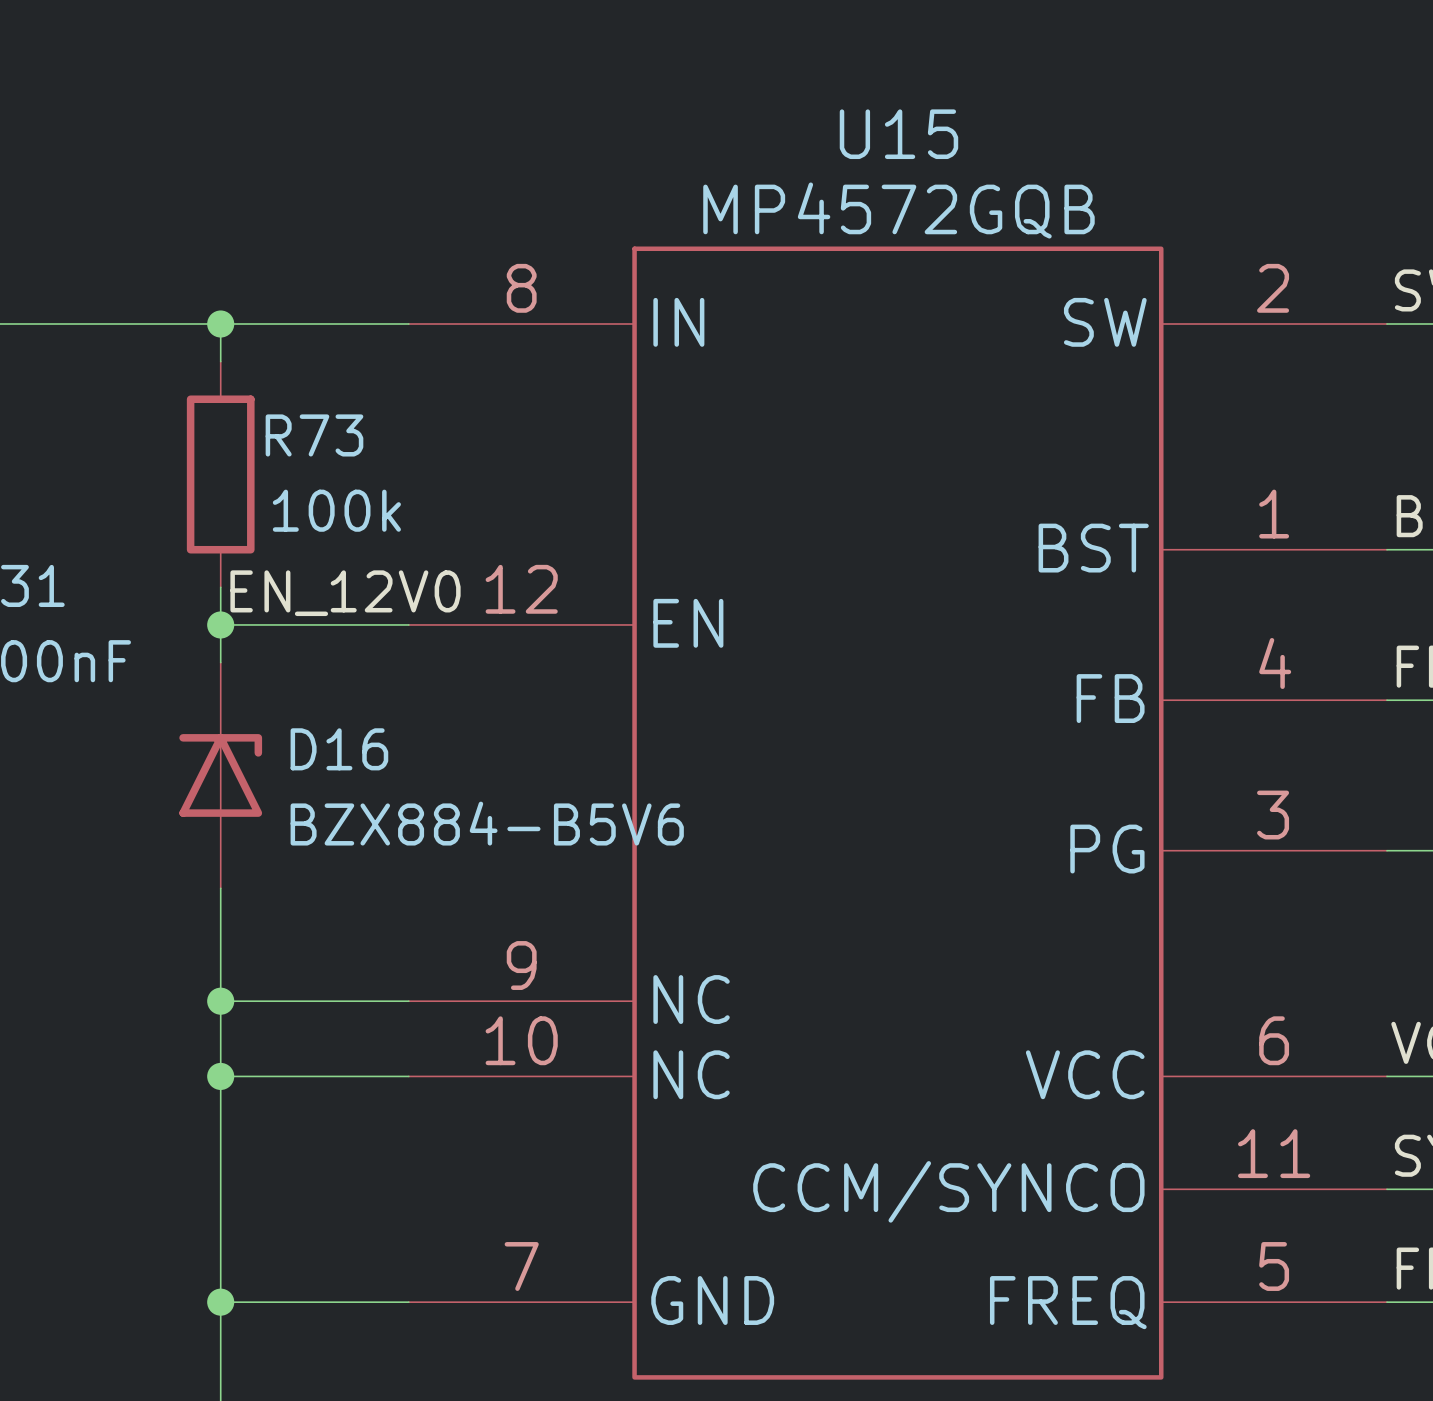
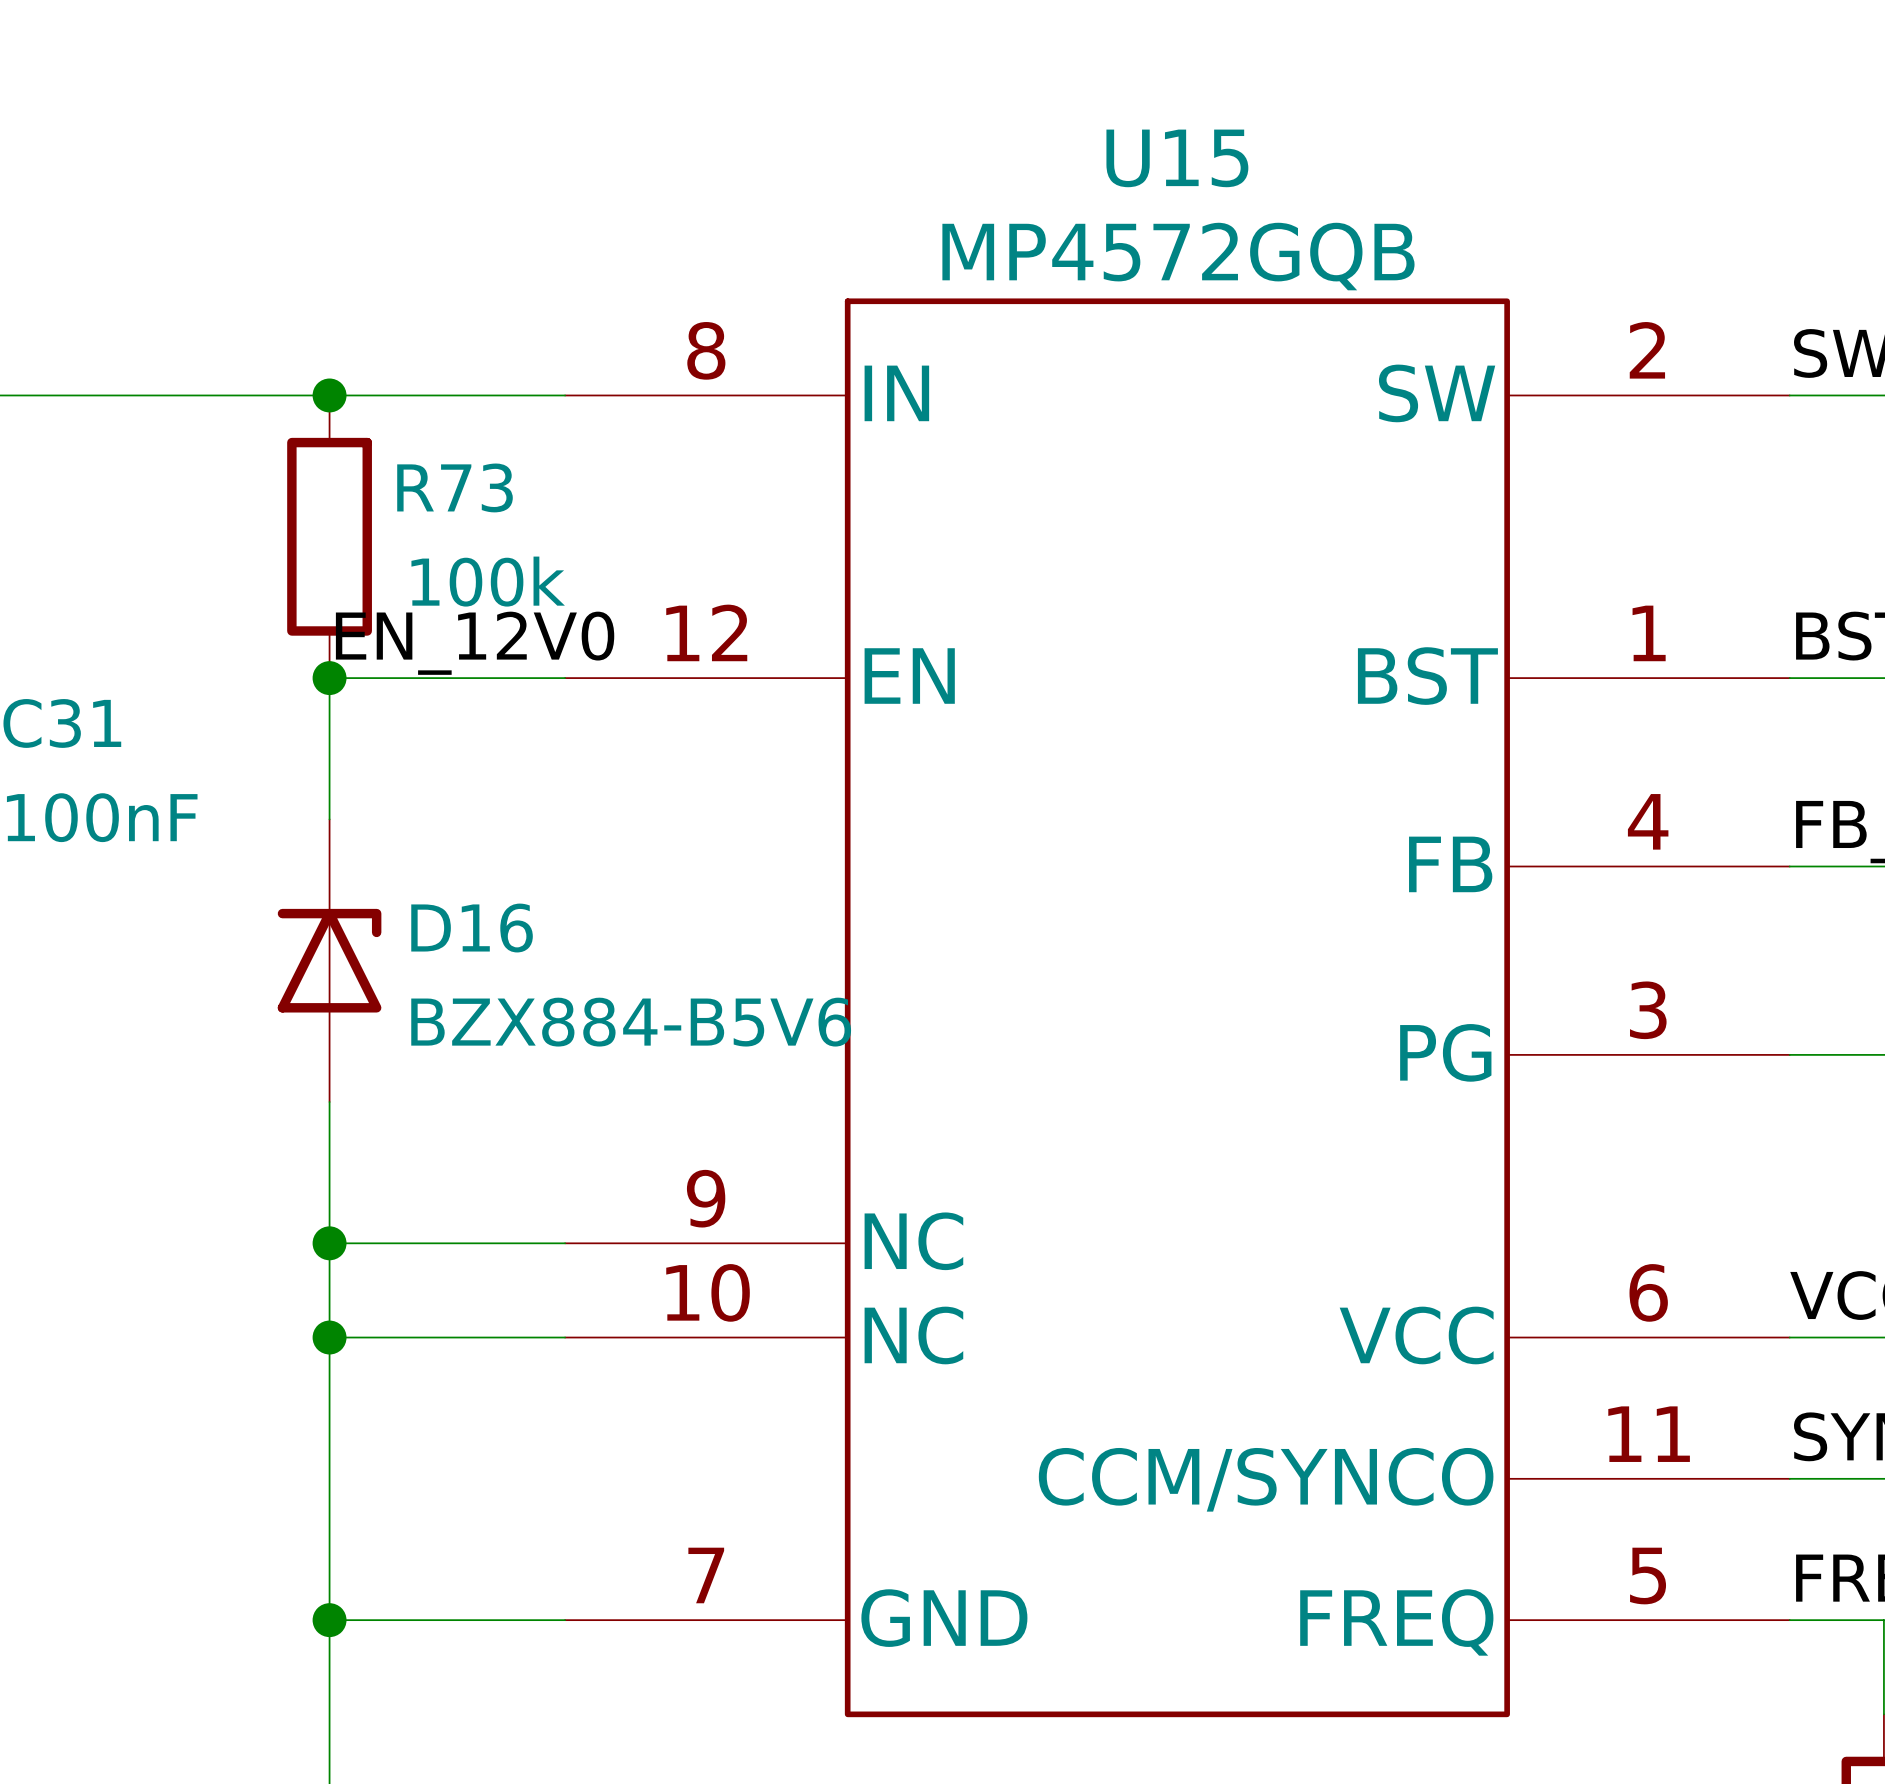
U15 symbol: [408, 246, 1387, 1380] -> [565, 298, 1790, 1718]
R73 position: (220, 474) -> (329, 536)
wire: none -> (565, 678) (329, 678) (329, 725)
label position: EN_12V0 (345, 593) -> EN_12V0 (475, 643)
wire: (220, 624) (408, 624) -> none
junction position: (220, 624) -> (329, 678)

